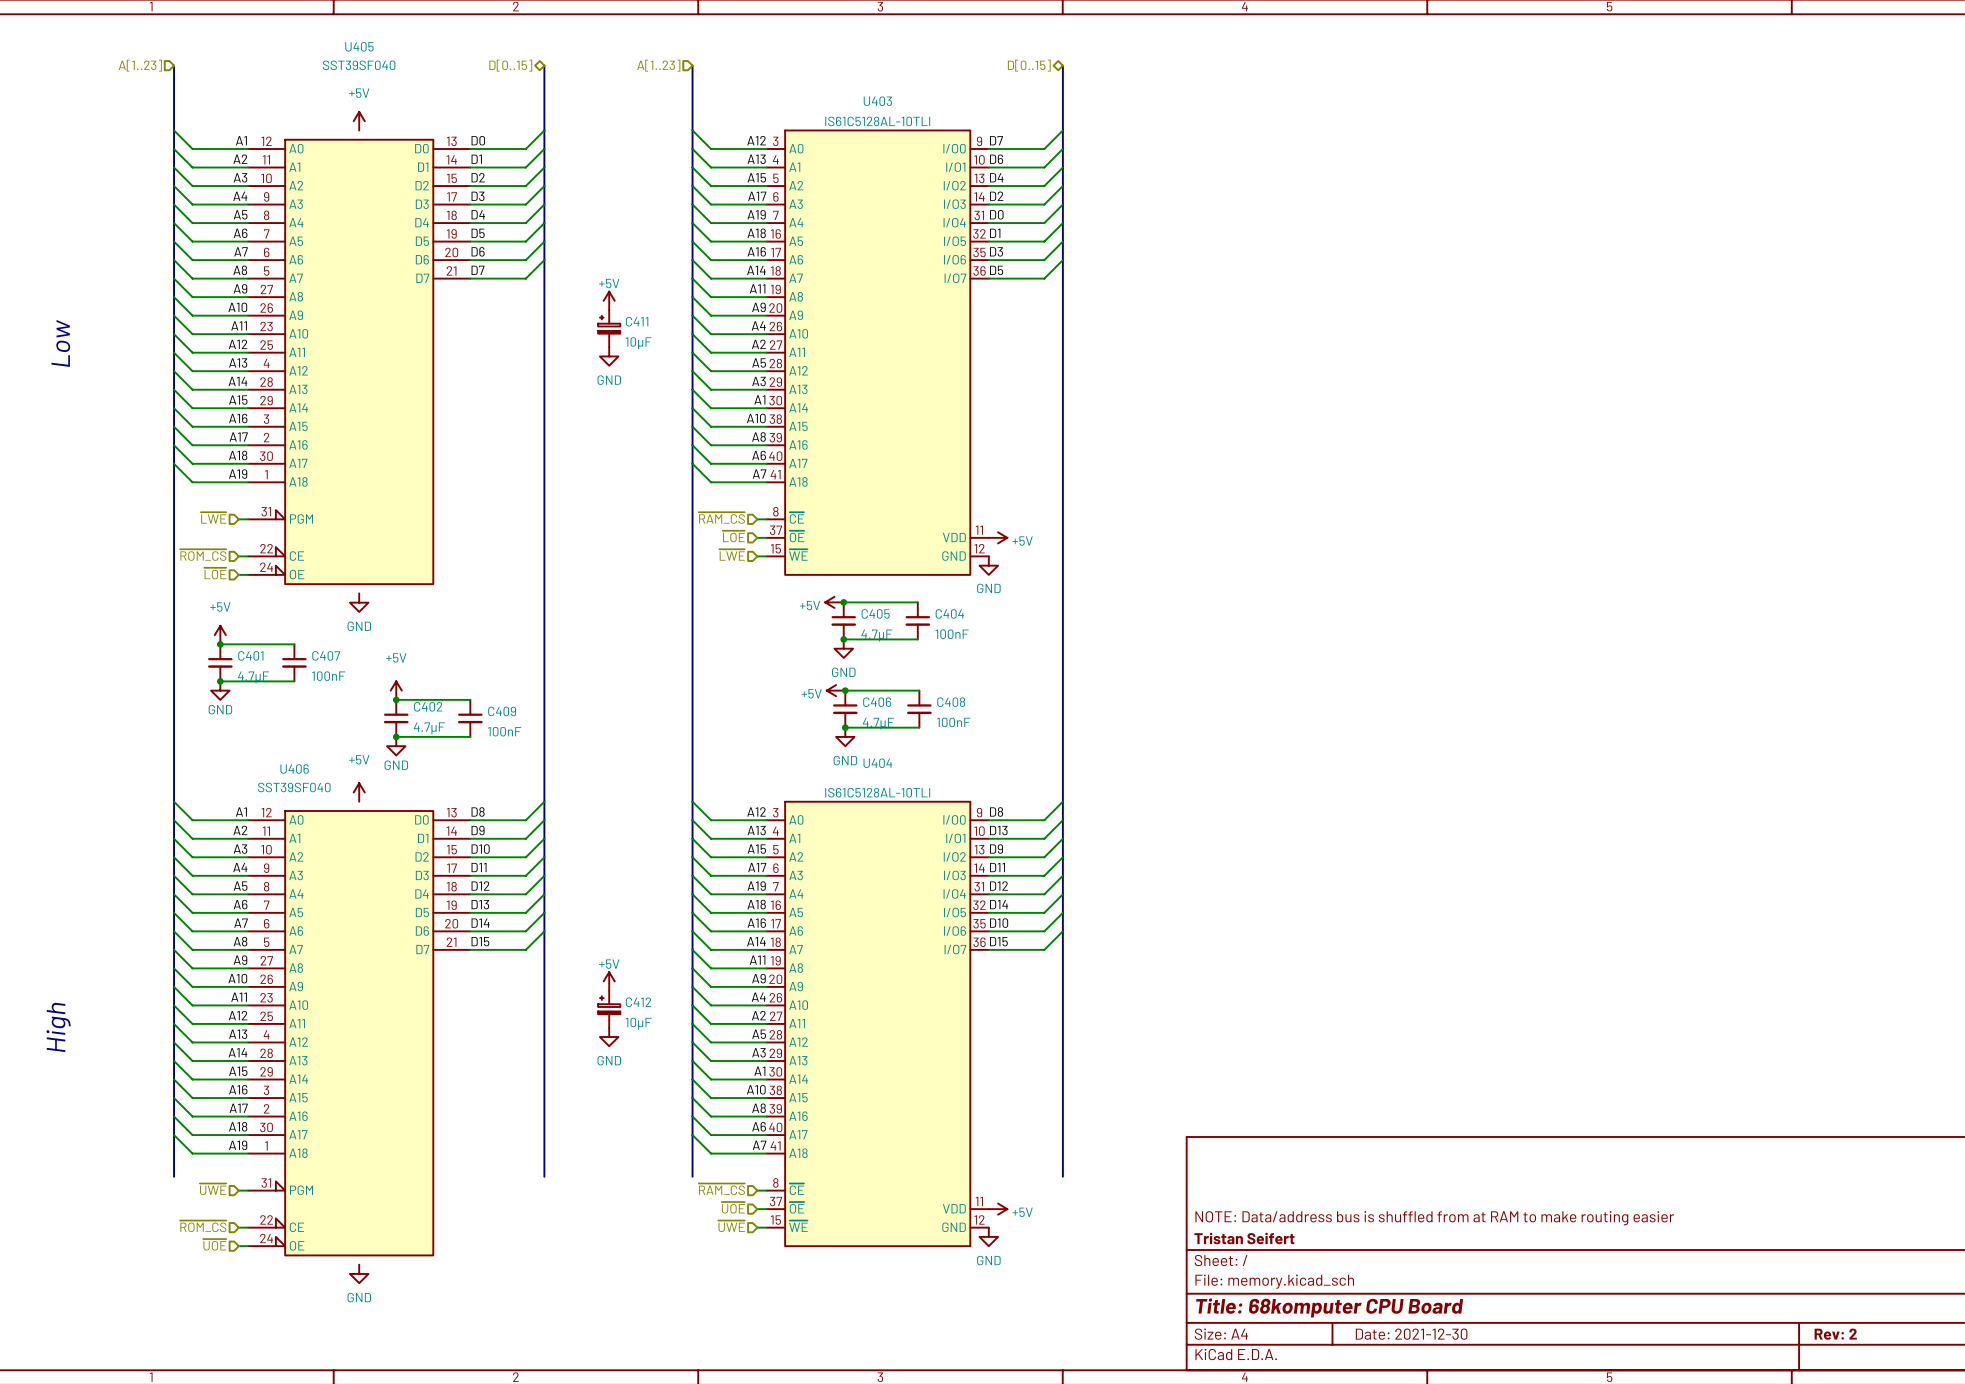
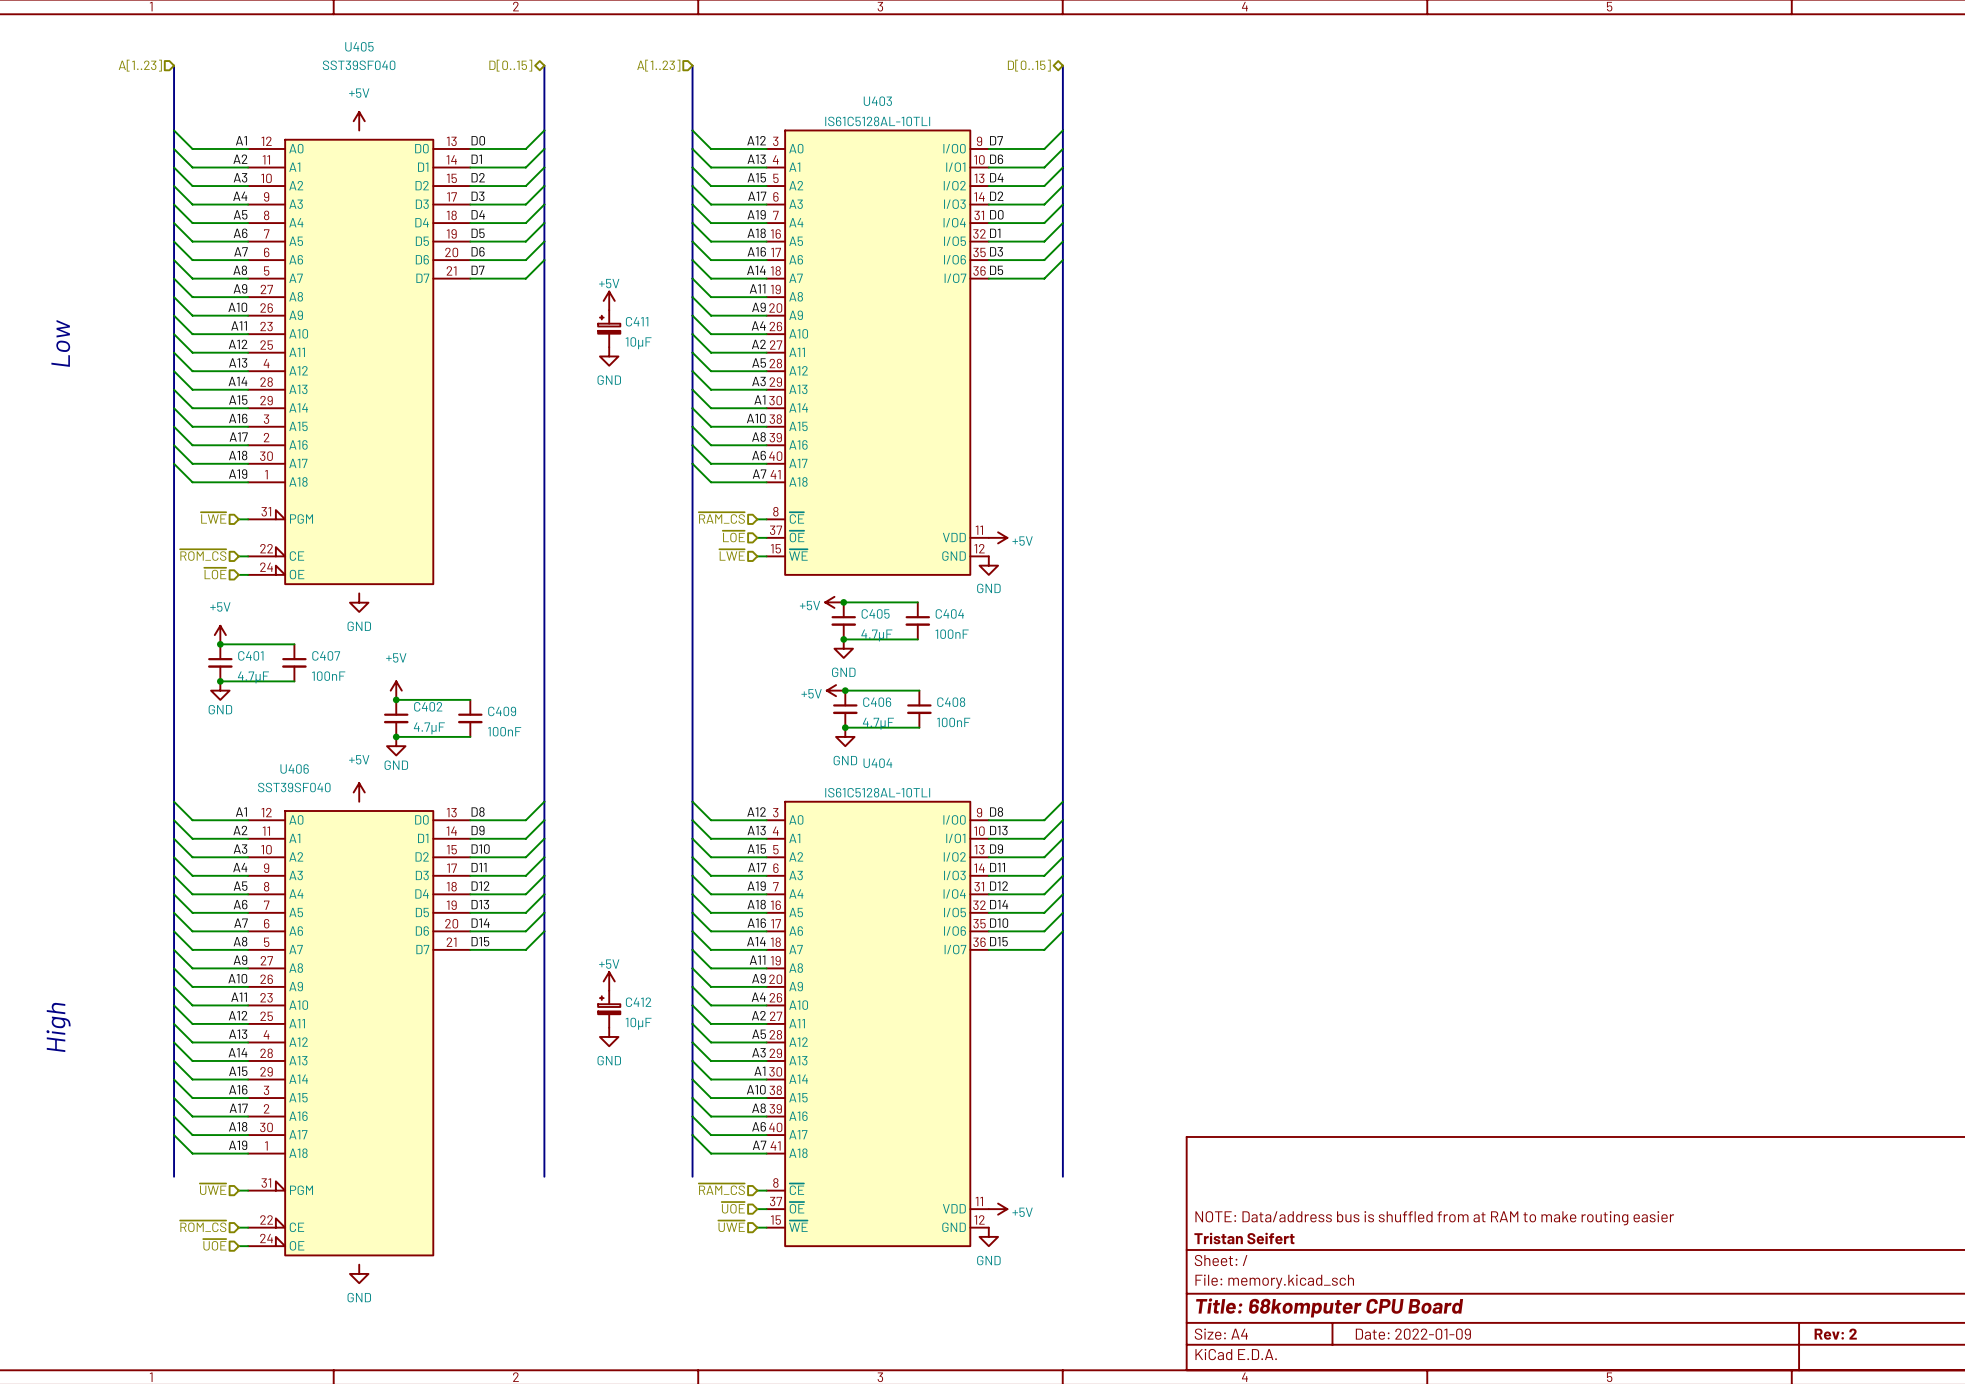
title block: Date: 2021-12-30 (1411, 1334) -> Date: 2022-01-09 (1413, 1334)

